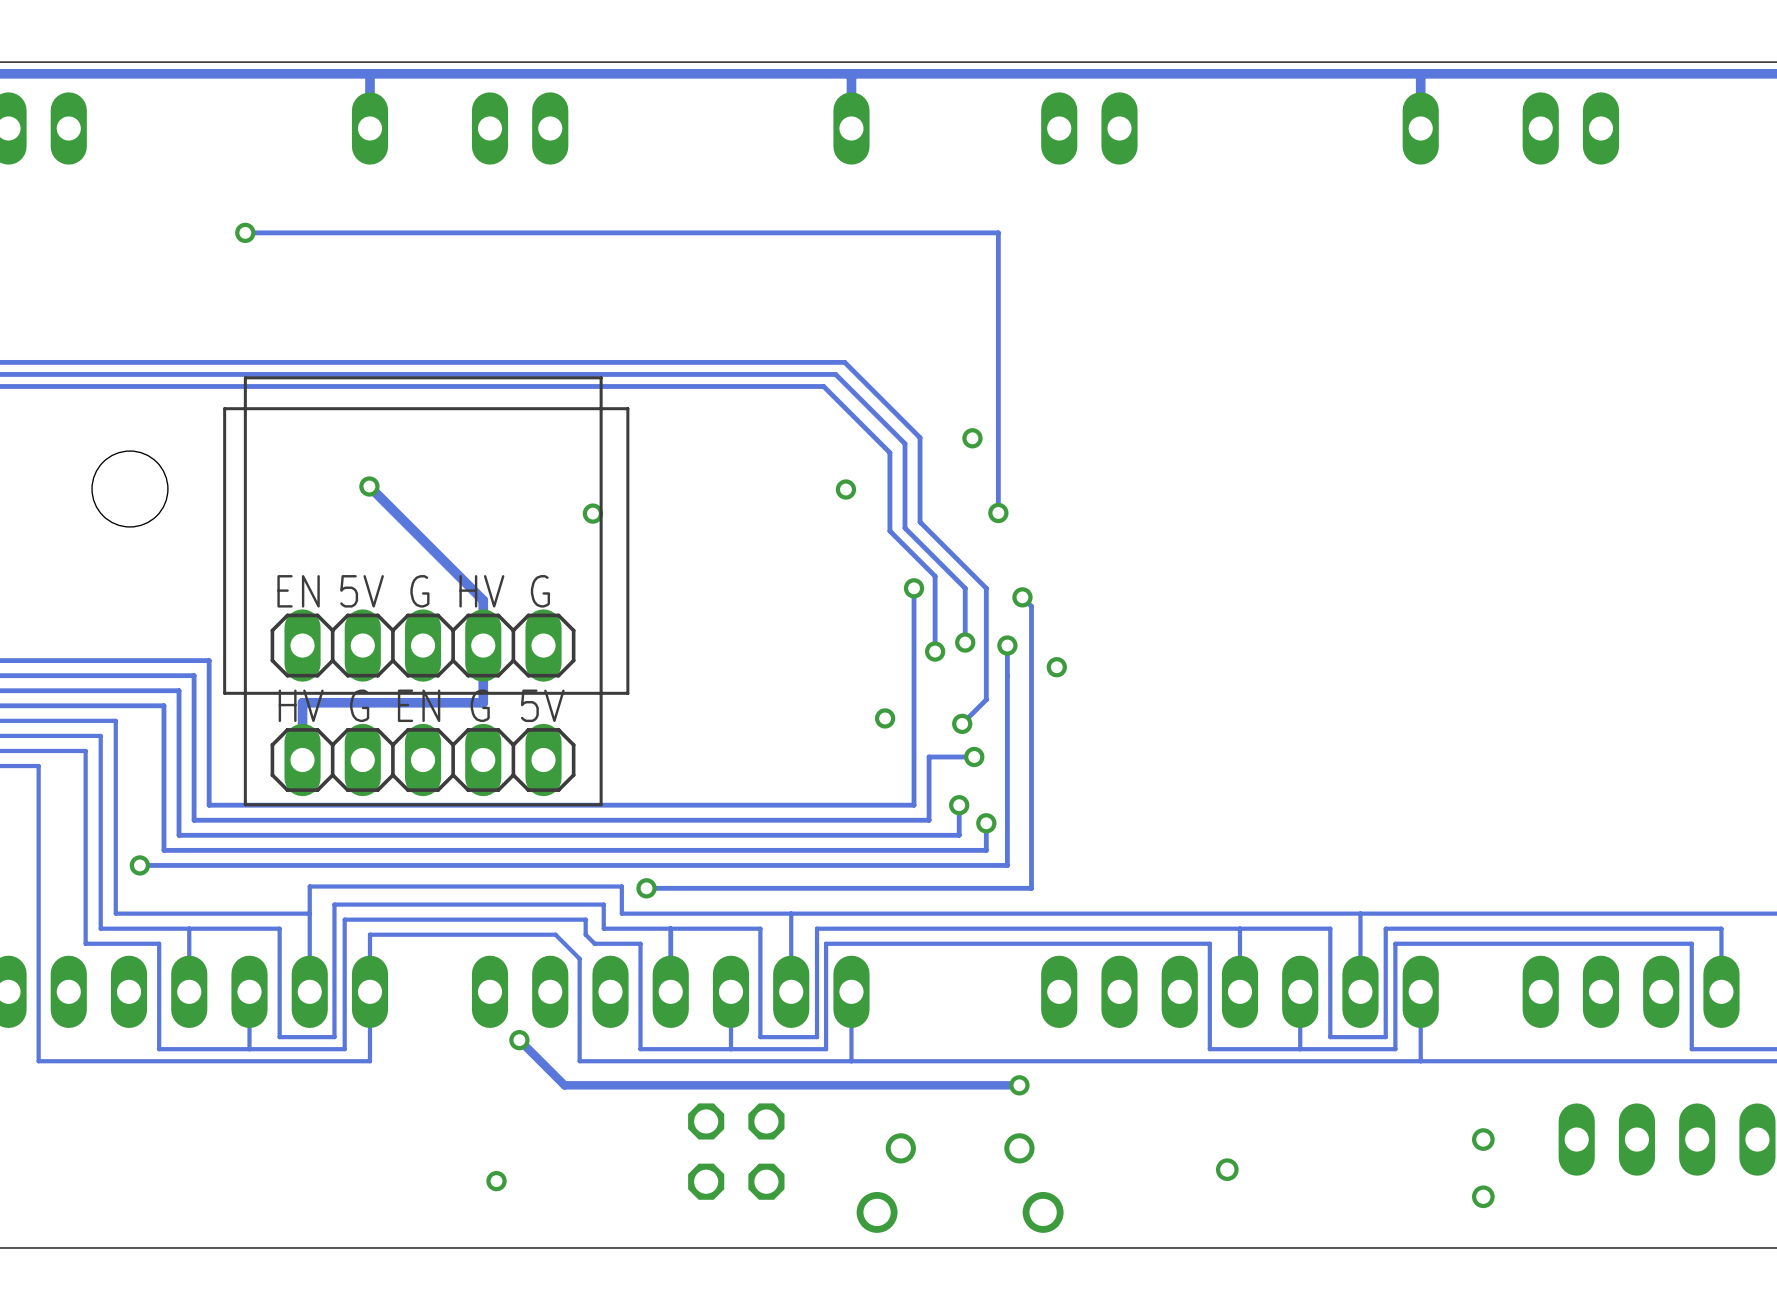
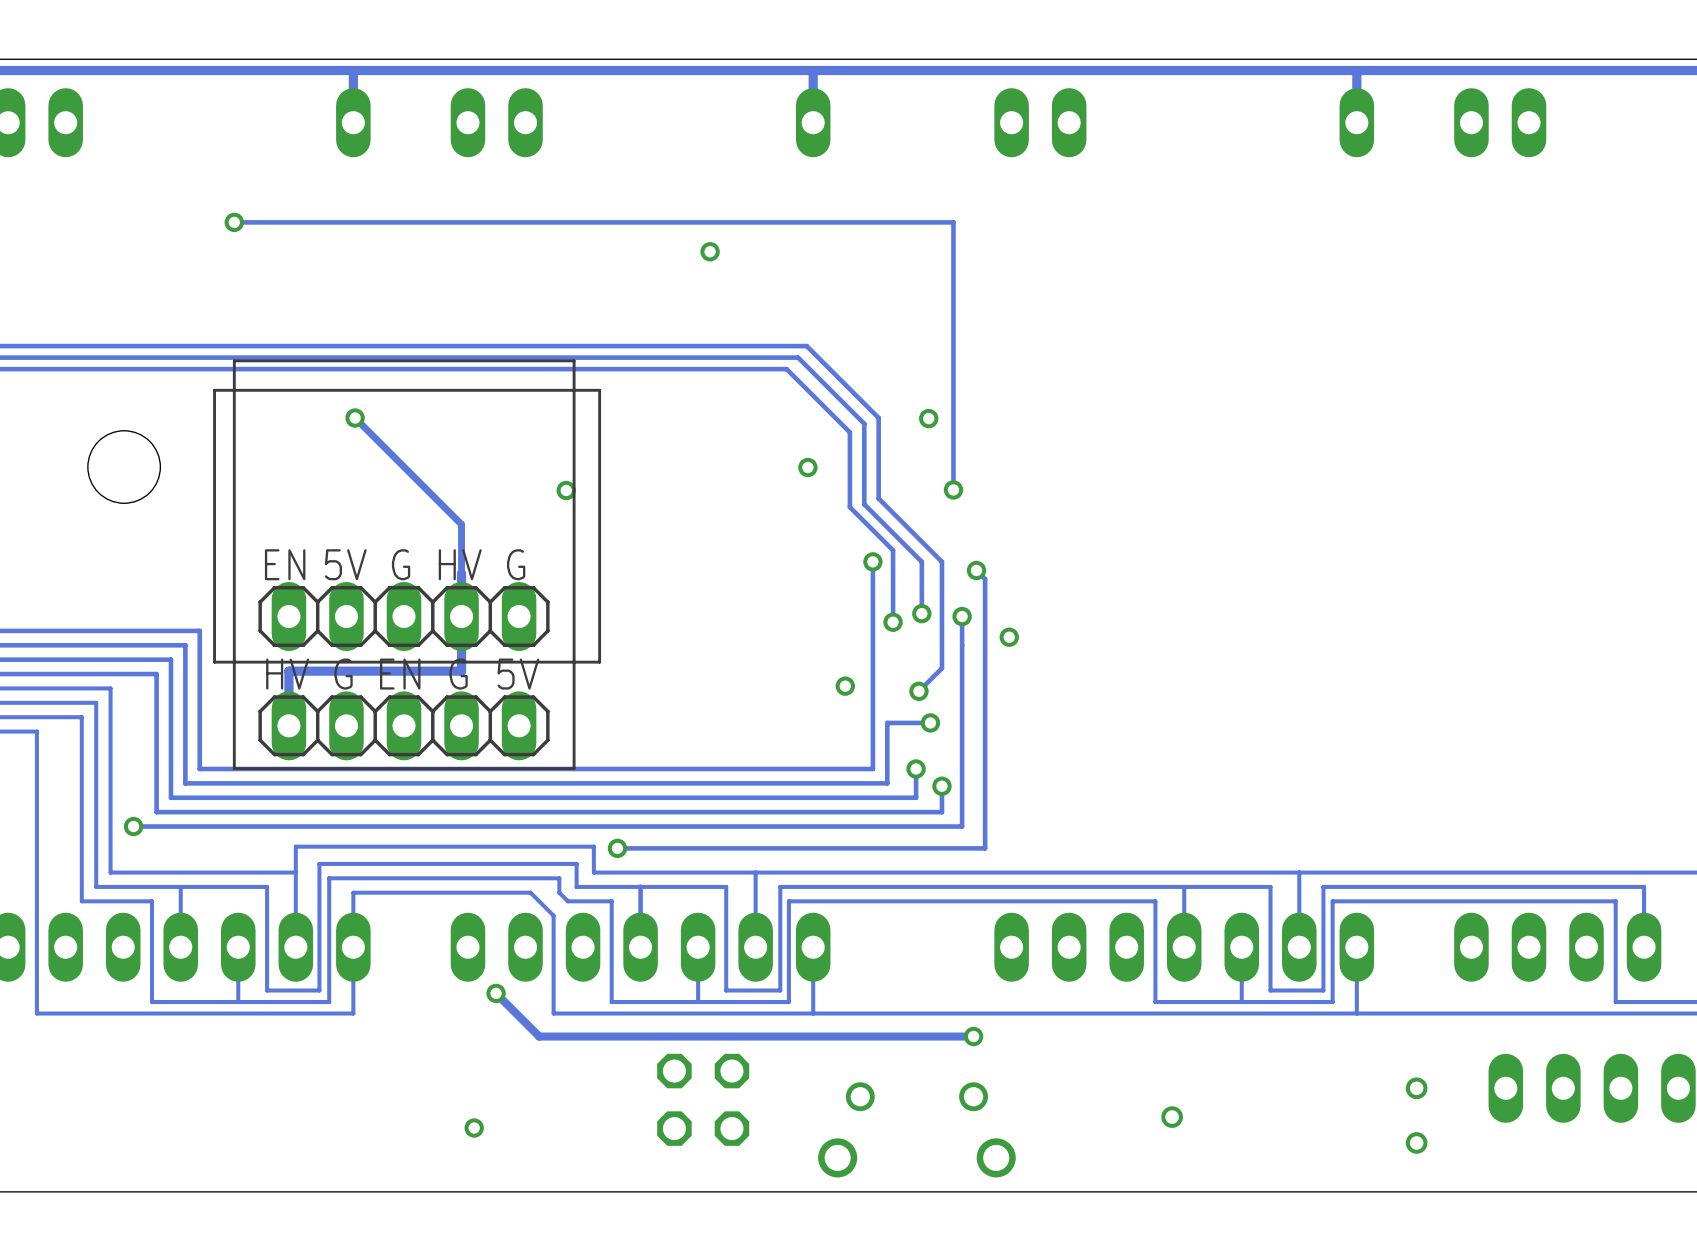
via: none -> (710, 251)
track: (369, 486) (483, 600) -> (355, 418) (461, 524) (461, 573)
via position: (369, 486) -> (355, 418)

